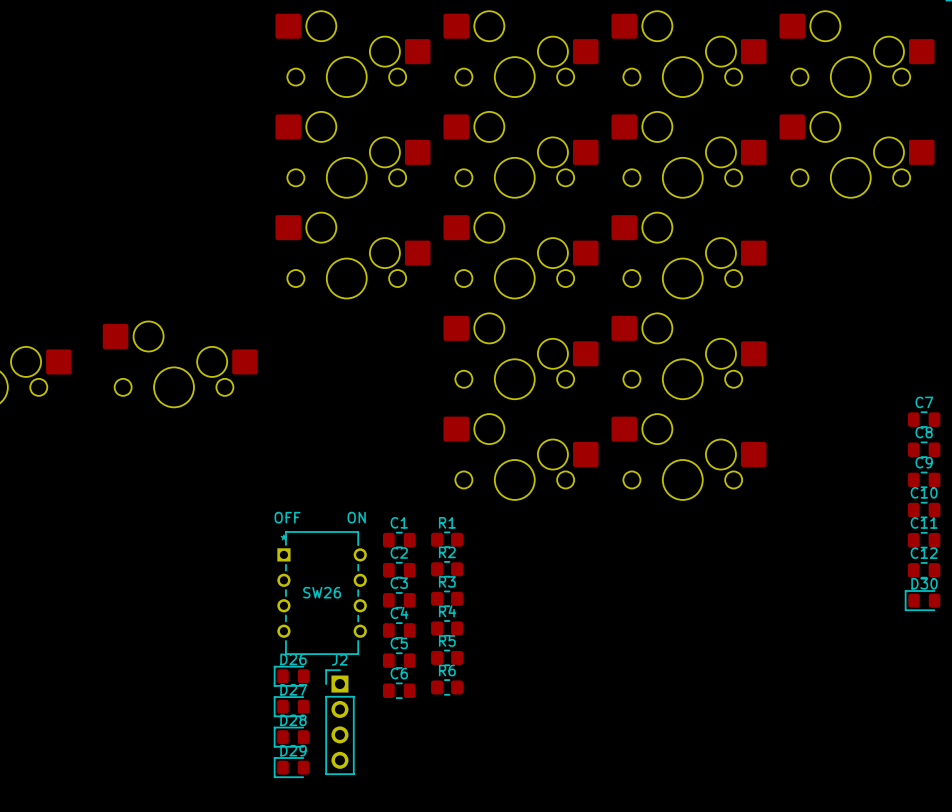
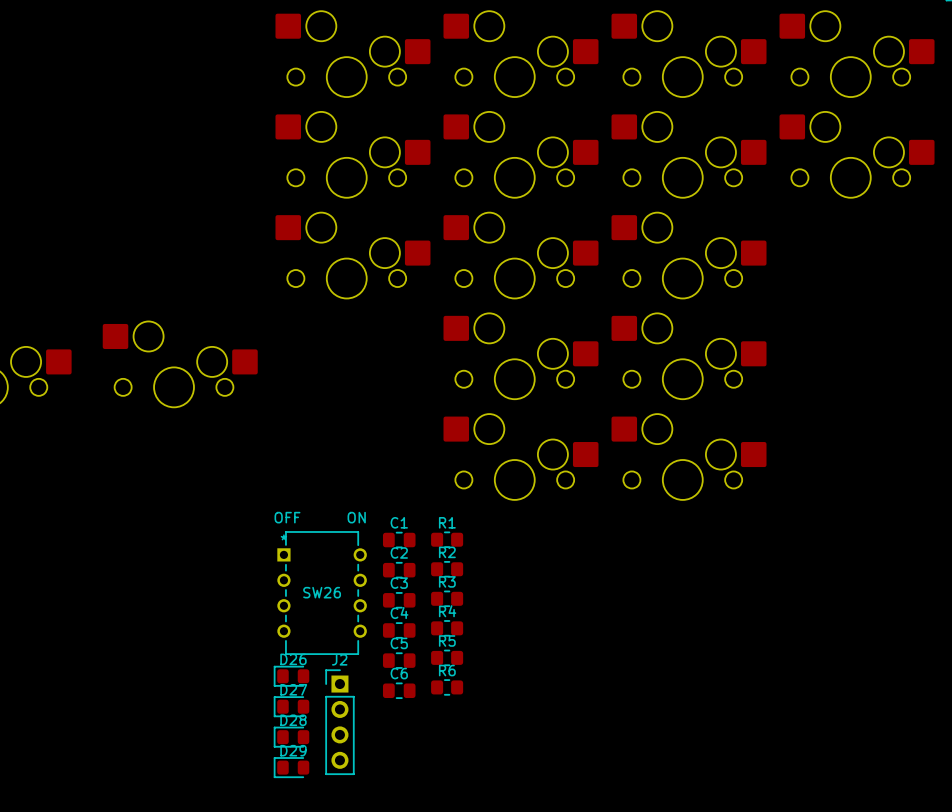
C7: (924, 419) -> none
C8: (924, 449) -> none
C9: (924, 479) -> none
C10: (924, 510) -> none
C11: (924, 540) -> none
C12: (924, 570) -> none
D30: (922, 600) -> none

